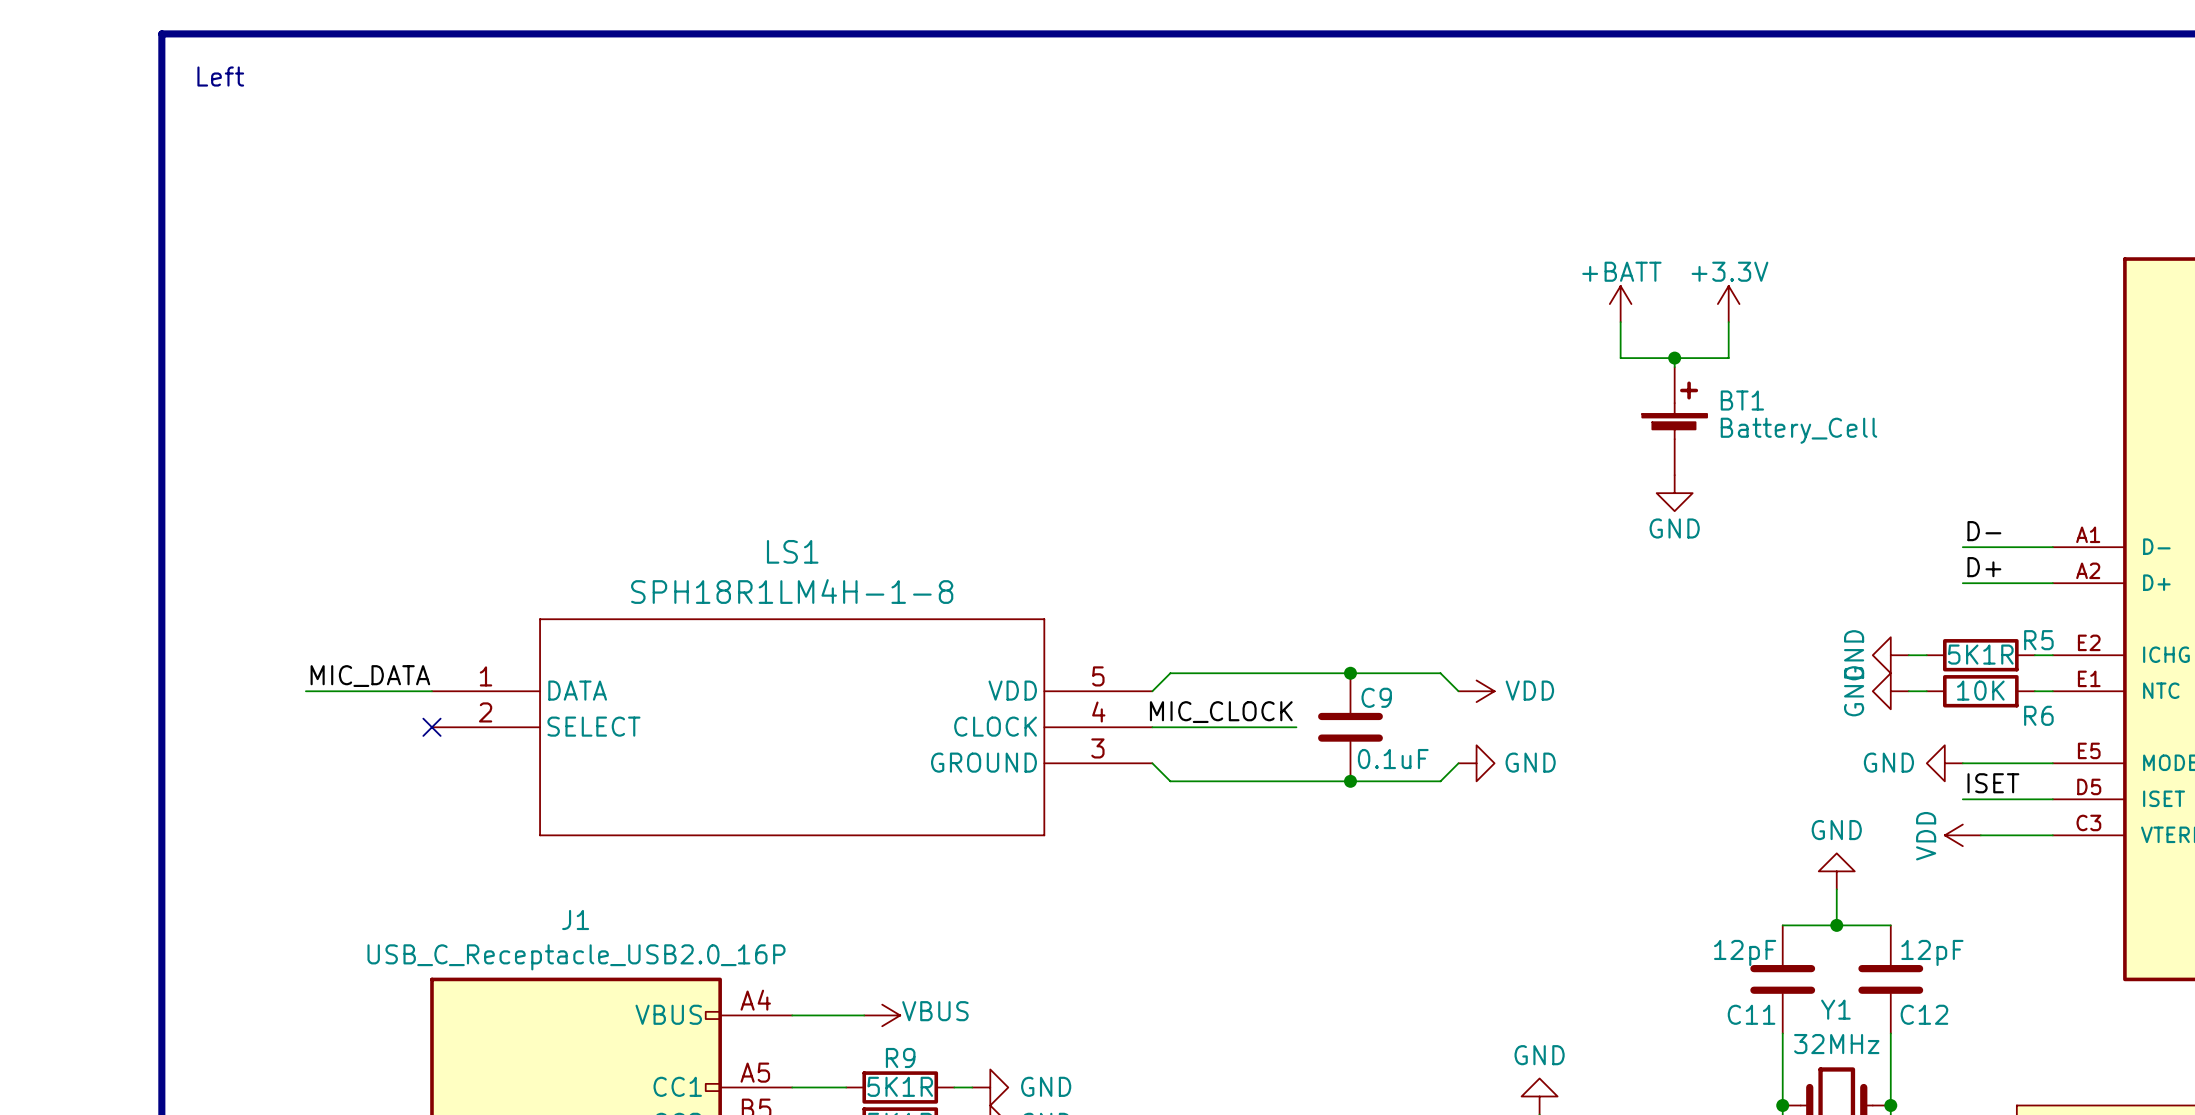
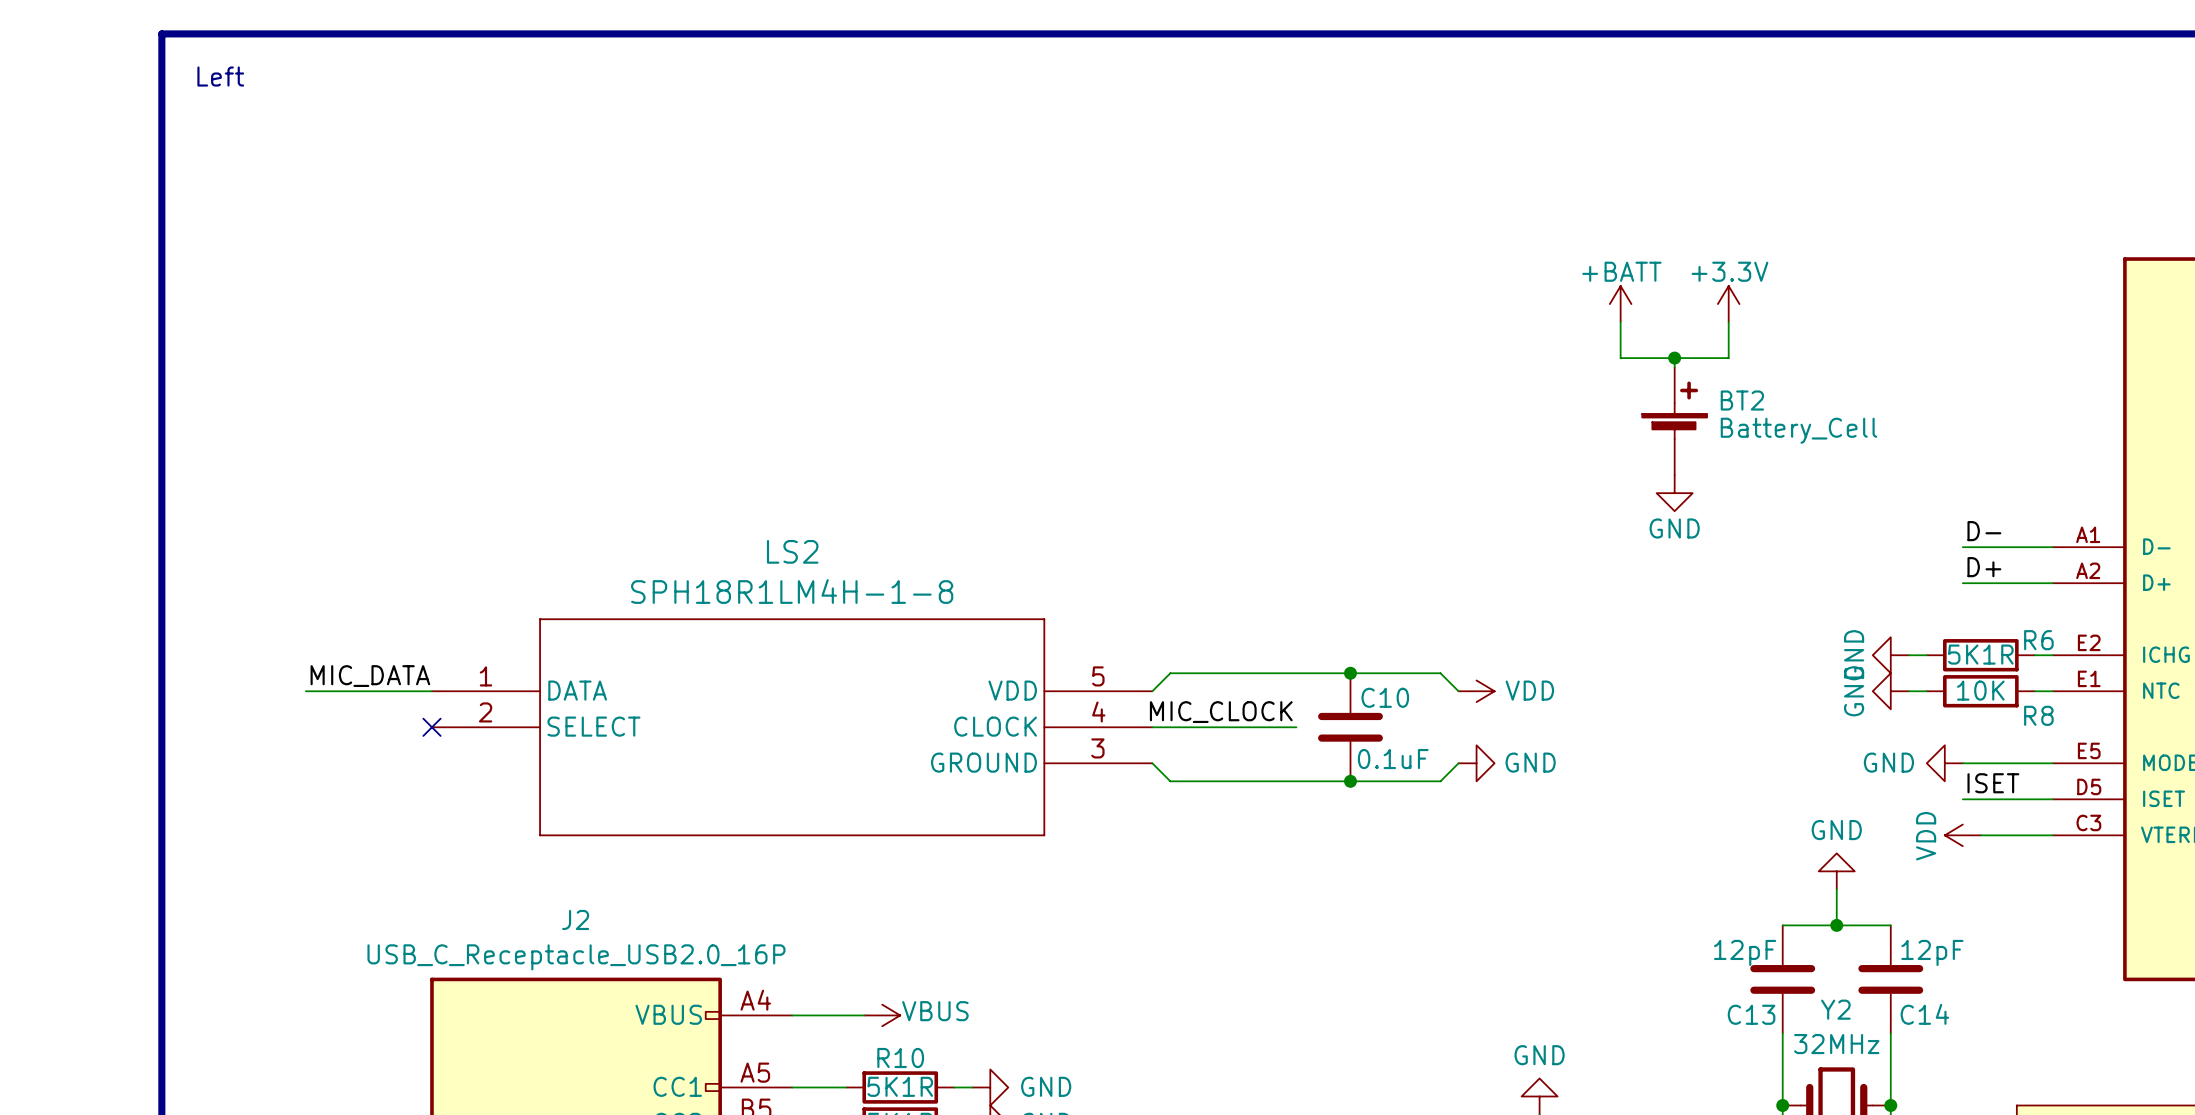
BT1 name: BT1 (1742, 400) -> BT2 (1742, 400)
LS1 name: LS1 (792, 551) -> LS2 (792, 551)
R5 name: R5 (2038, 640) -> R6 (2038, 640)
C9 name: C9 (1376, 697) -> C10 (1385, 697)
R6 name: R6 (2038, 715) -> R8 (2038, 715)
J1 name: J1 (575, 919) -> J2 (575, 919)
Y1 name: Y1 (1835, 1009) -> Y2 (1835, 1009)
C11 name: C11 (1751, 1014) -> C13 (1751, 1014)
C12 name: C12 (1924, 1014) -> C14 (1924, 1014)
R9 name: R9 (900, 1057) -> R10 (900, 1057)

